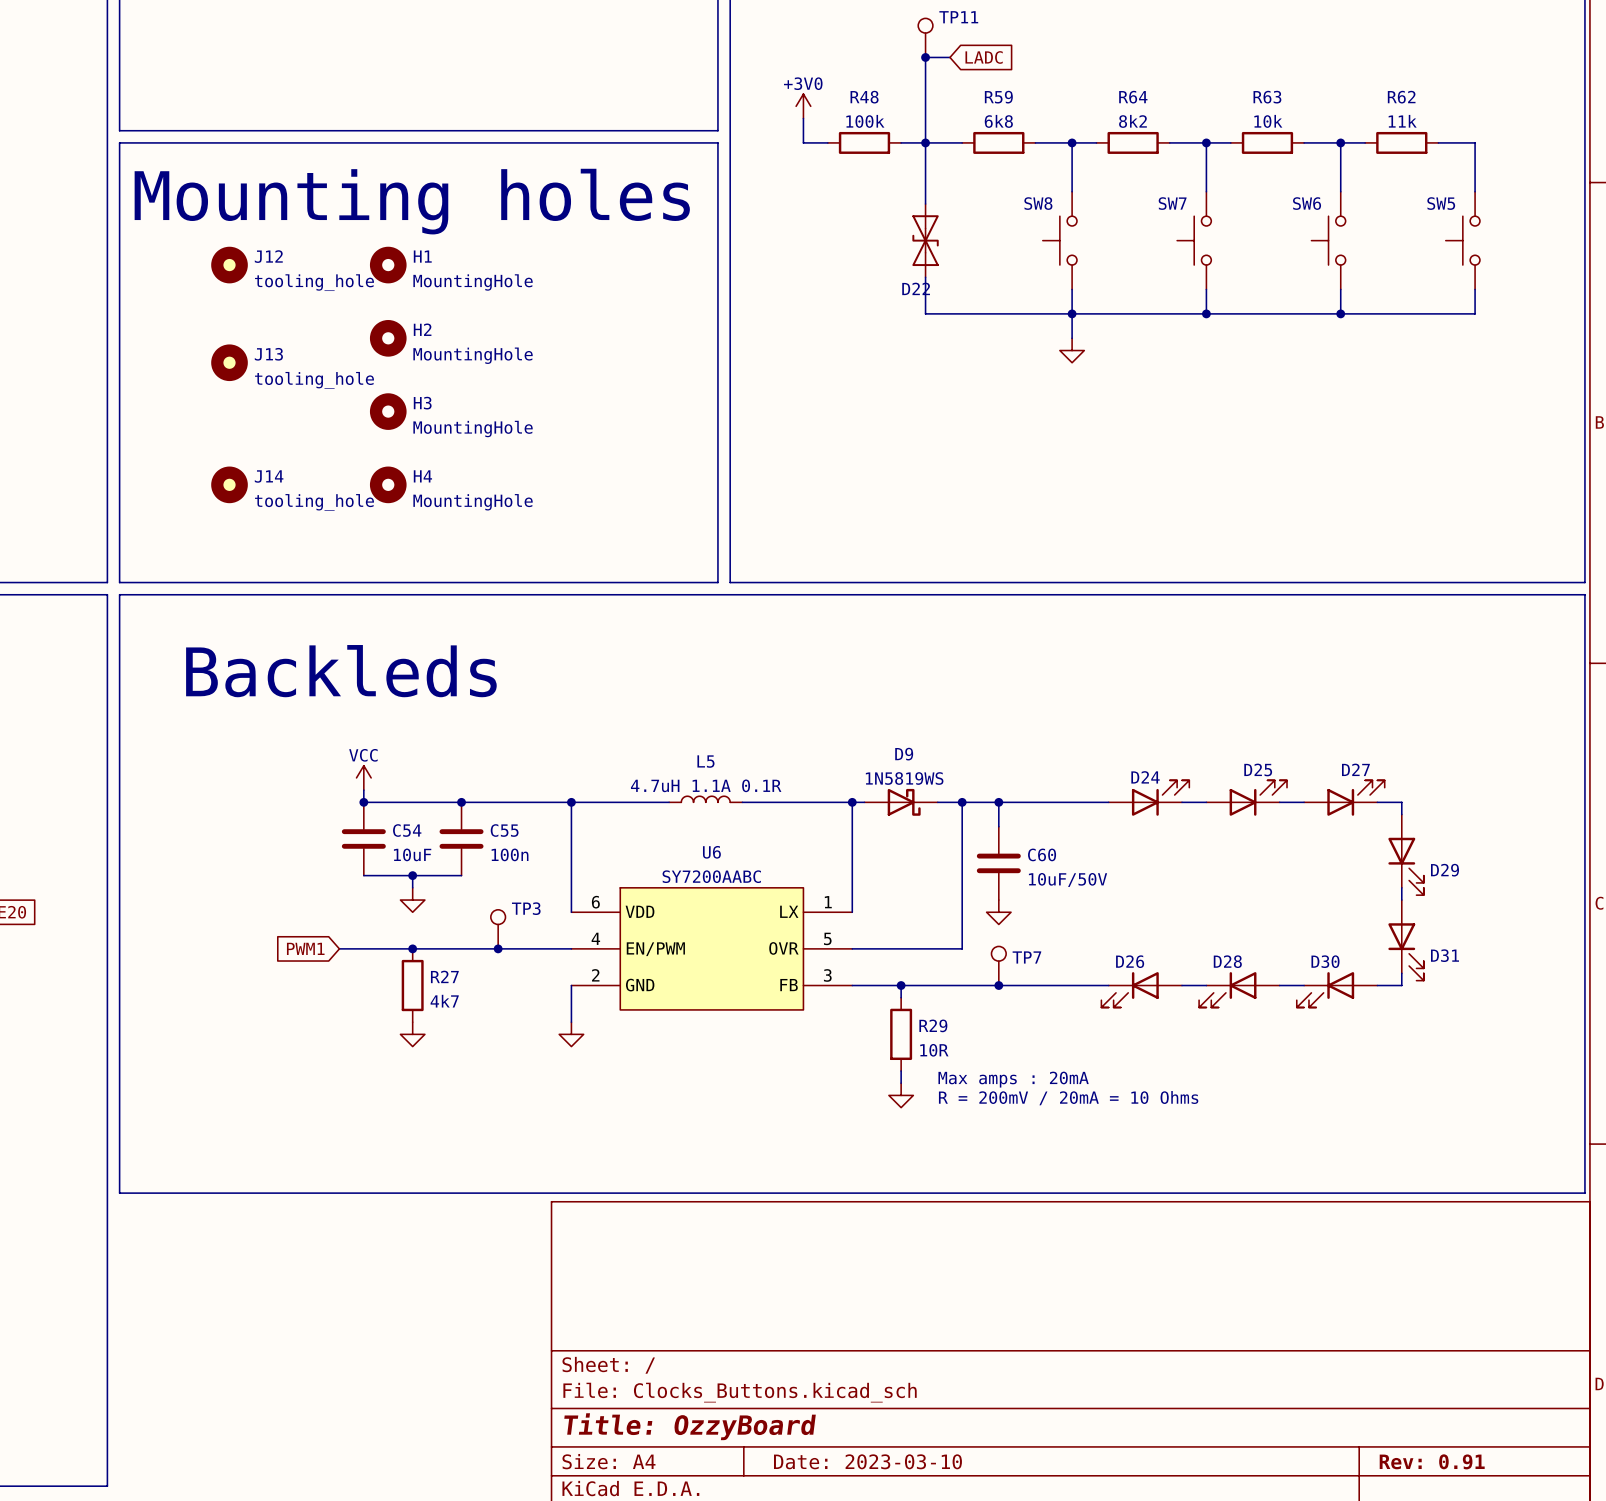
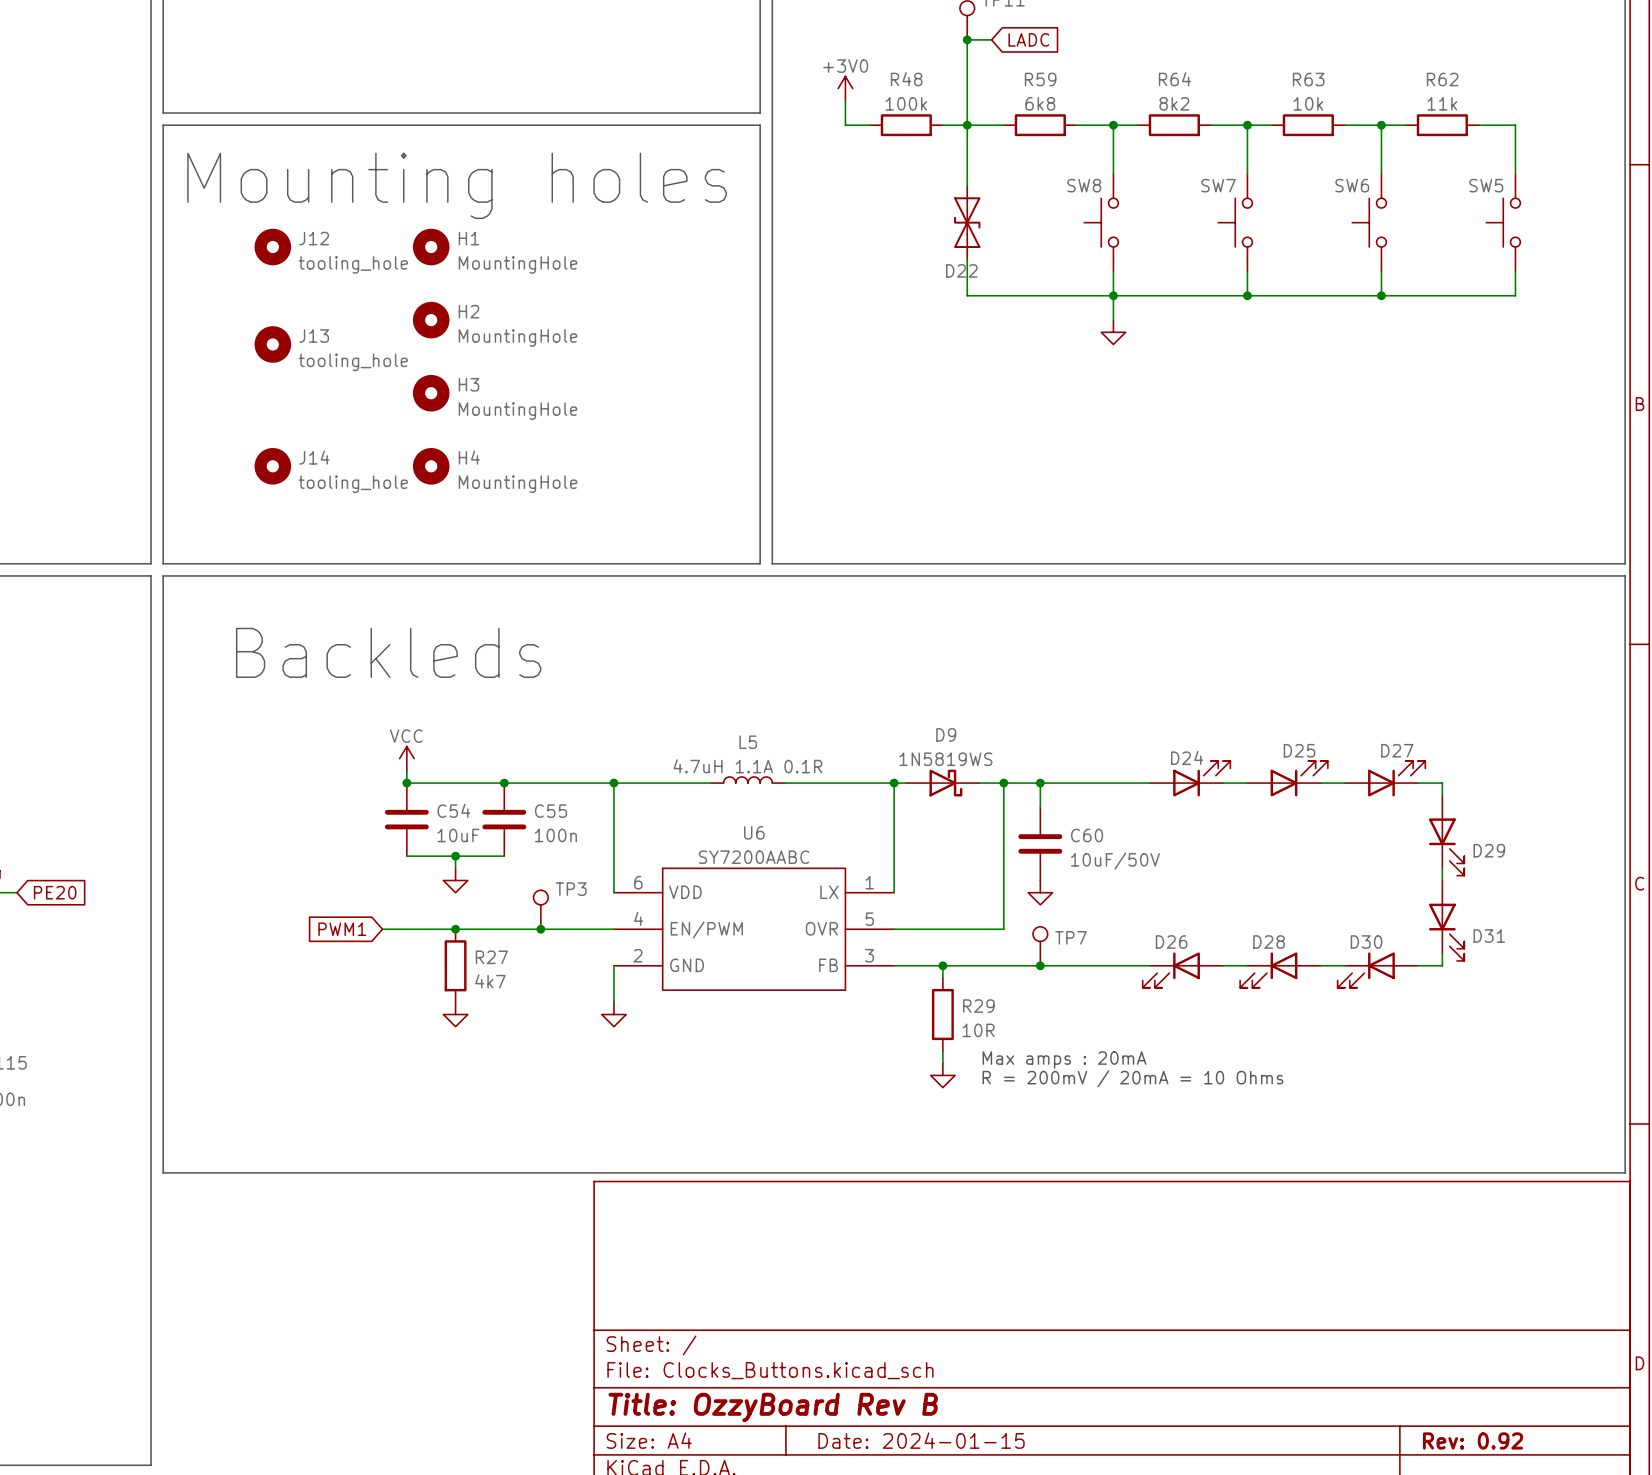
title block: Title: OzzyBoard (690, 1426) -> Title: OzzyBoard Rev B (773, 1407)
title block: Date: 2023-03-10 (867, 1461) -> Date: 2024-01-15 (921, 1440)
title block: Rev: 0.91 (1432, 1461) -> Rev: 0.92 (1473, 1440)

